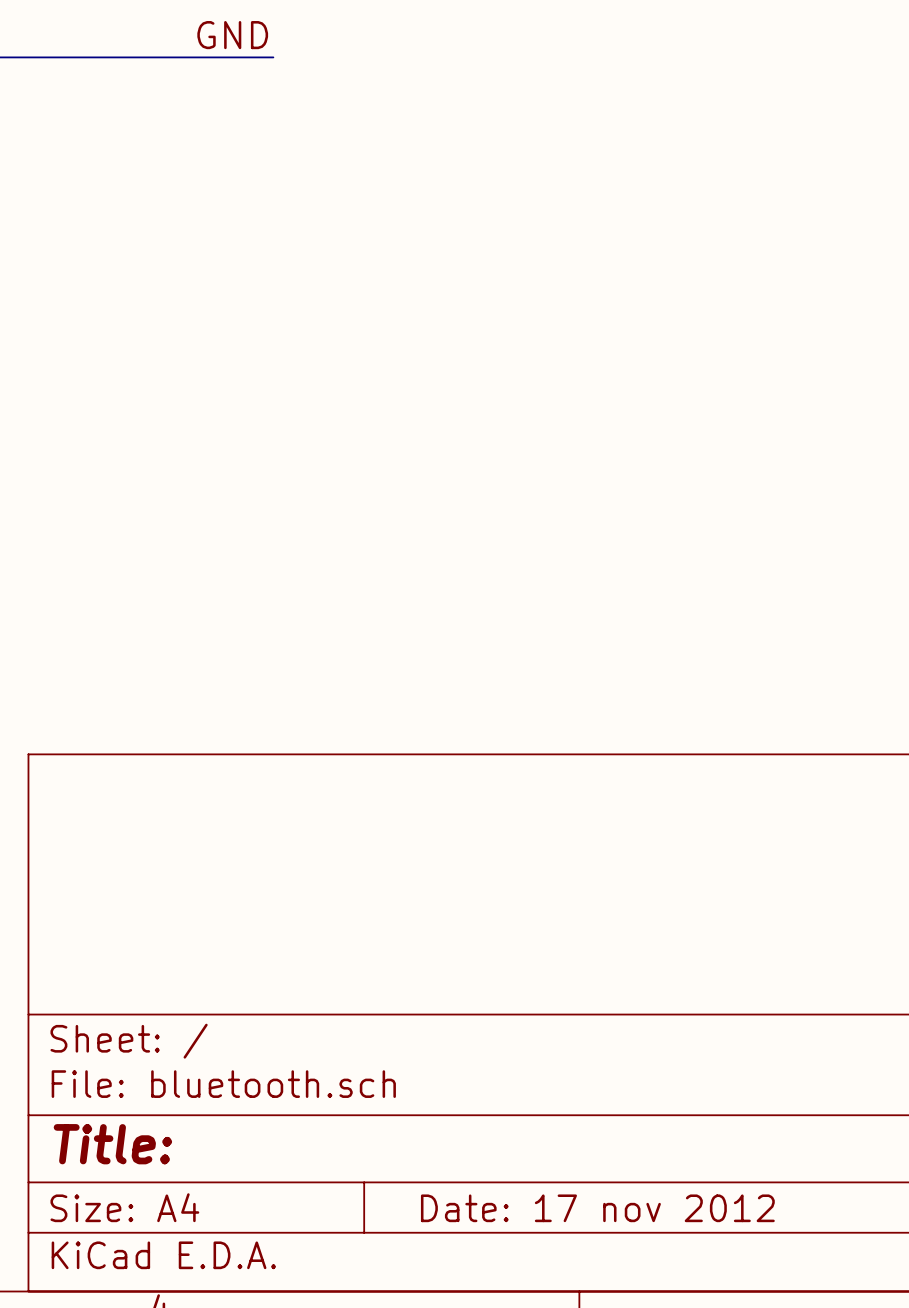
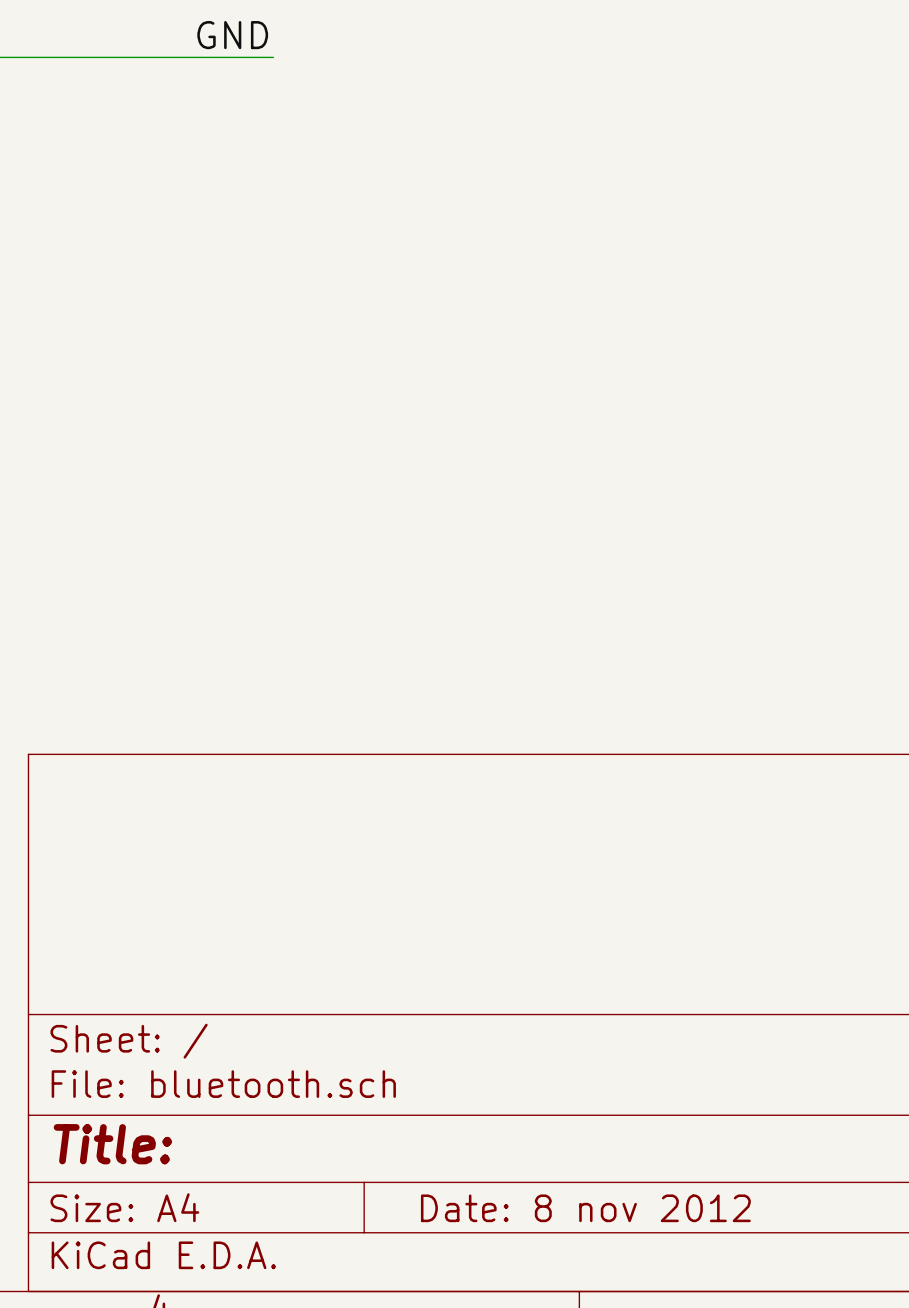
title block: Date: 17 nov 2012 (597, 1208) -> Date: 8 nov 2012 (585, 1208)

